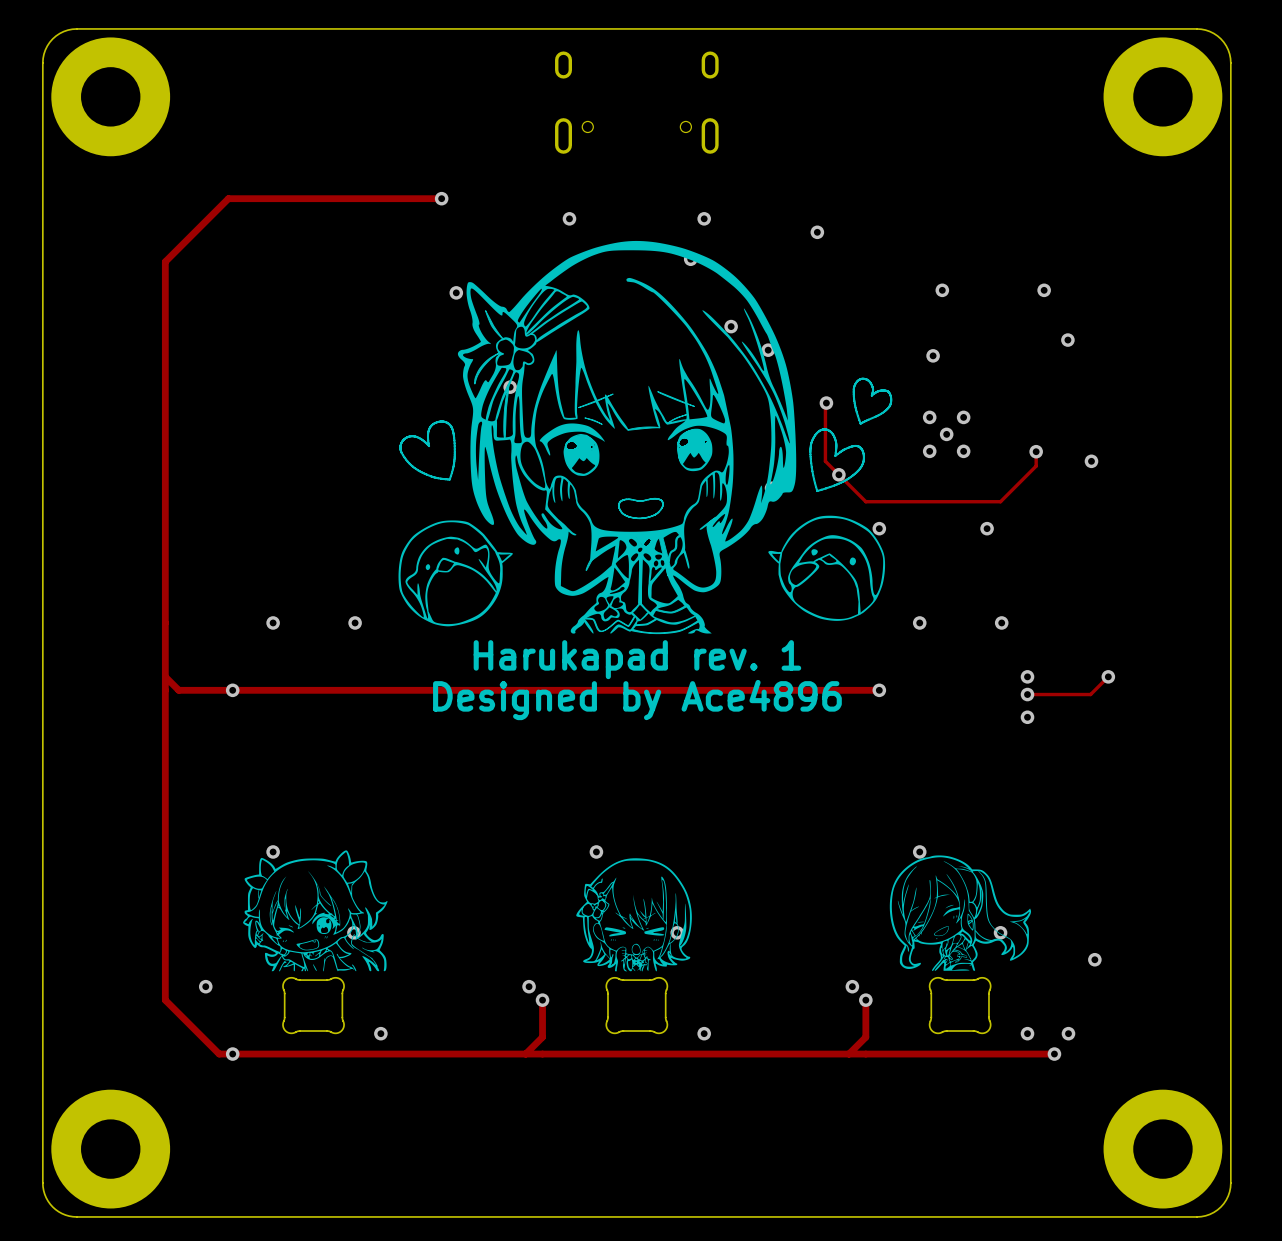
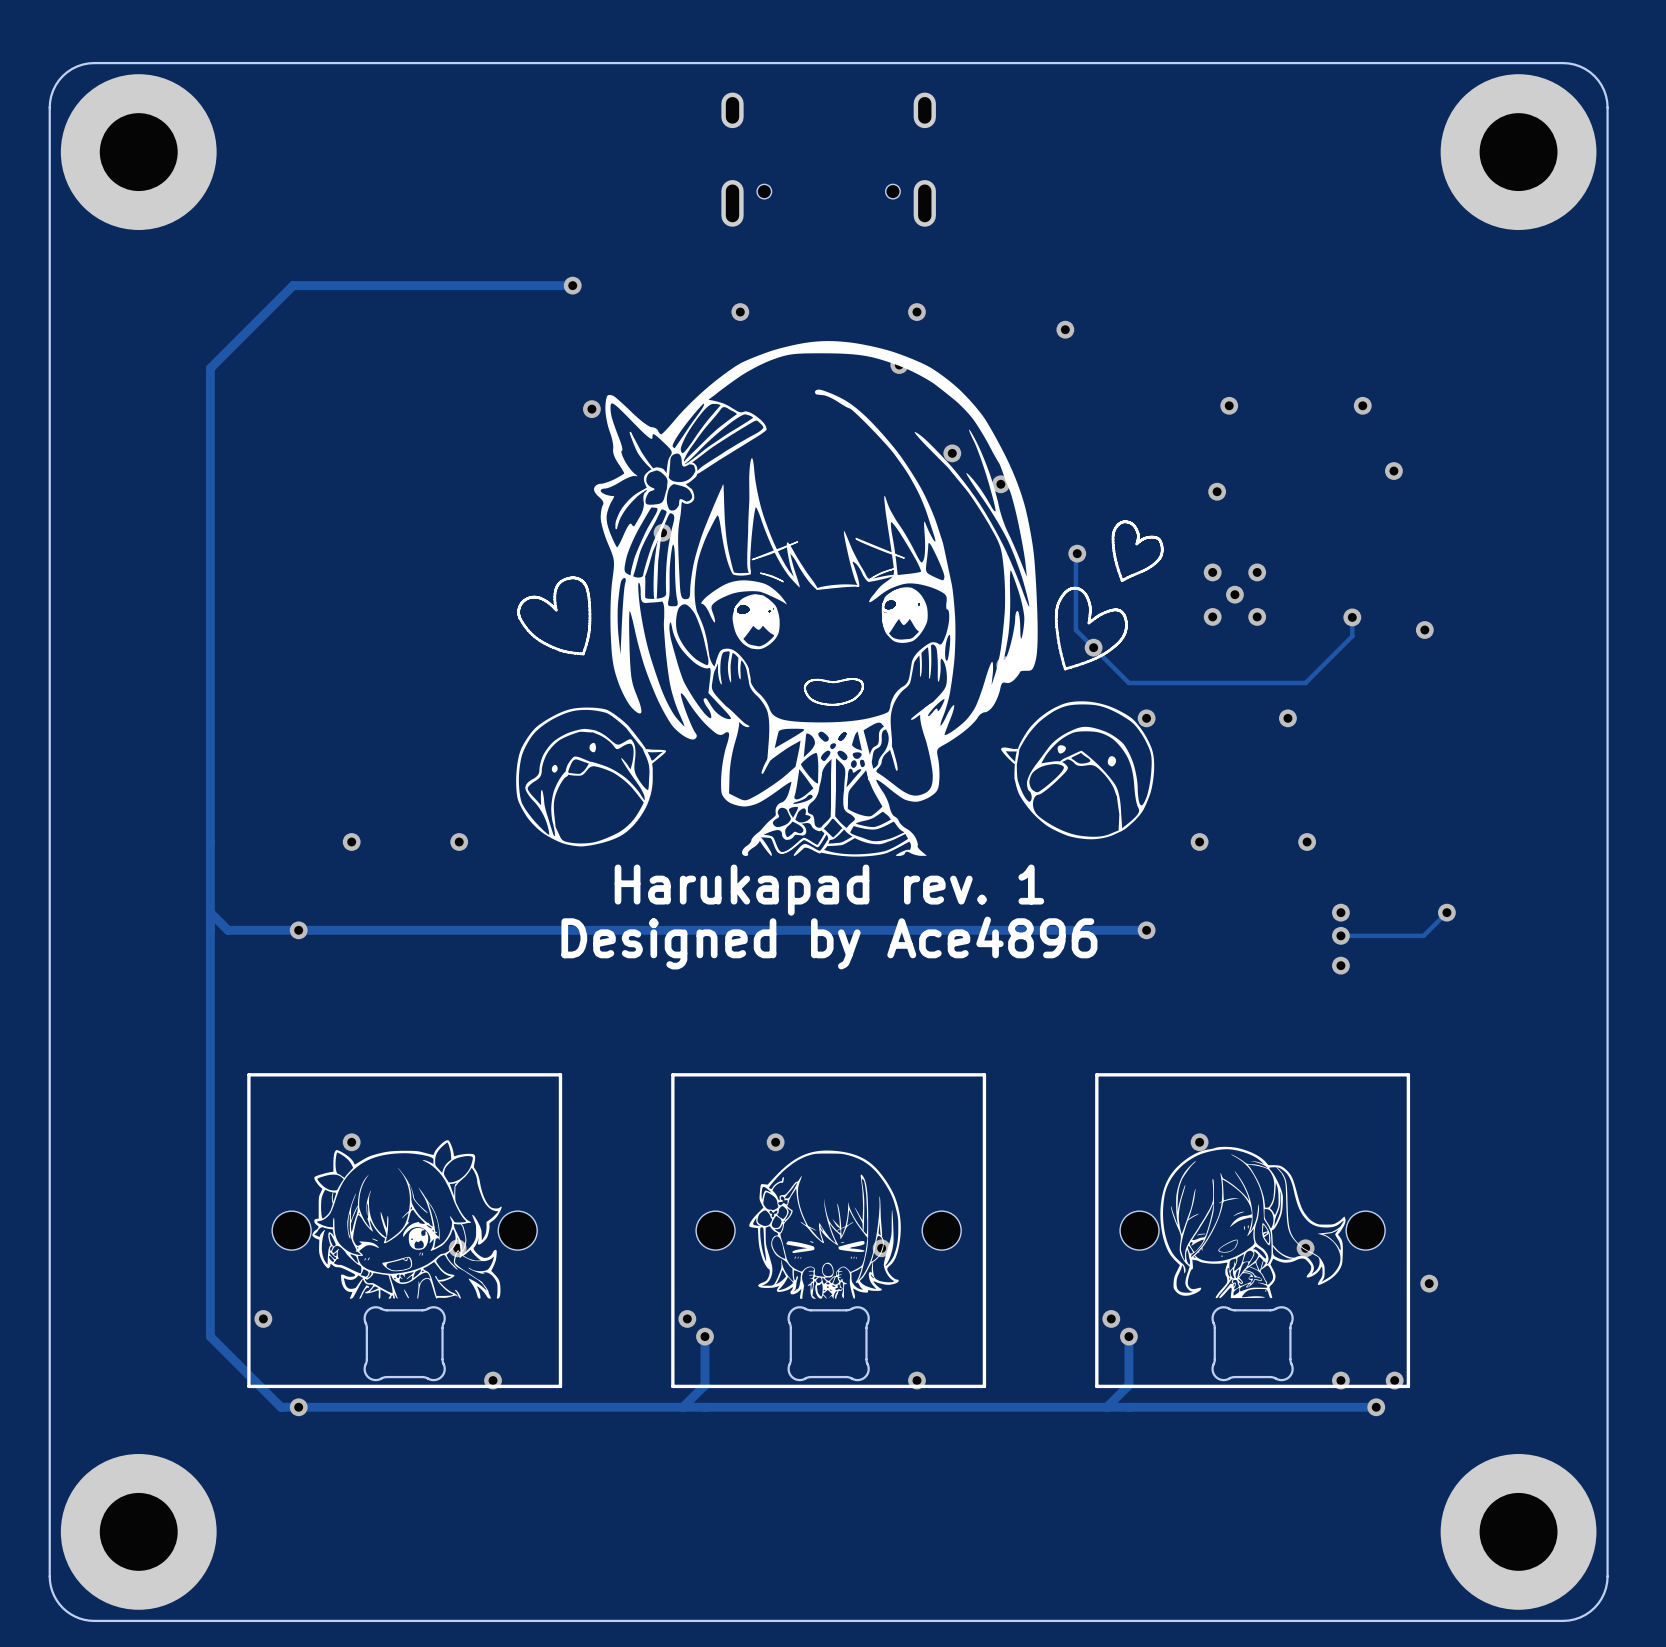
part: none -> (404, 1230)
part: none -> (828, 1230)
part: none -> (1252, 1230)

